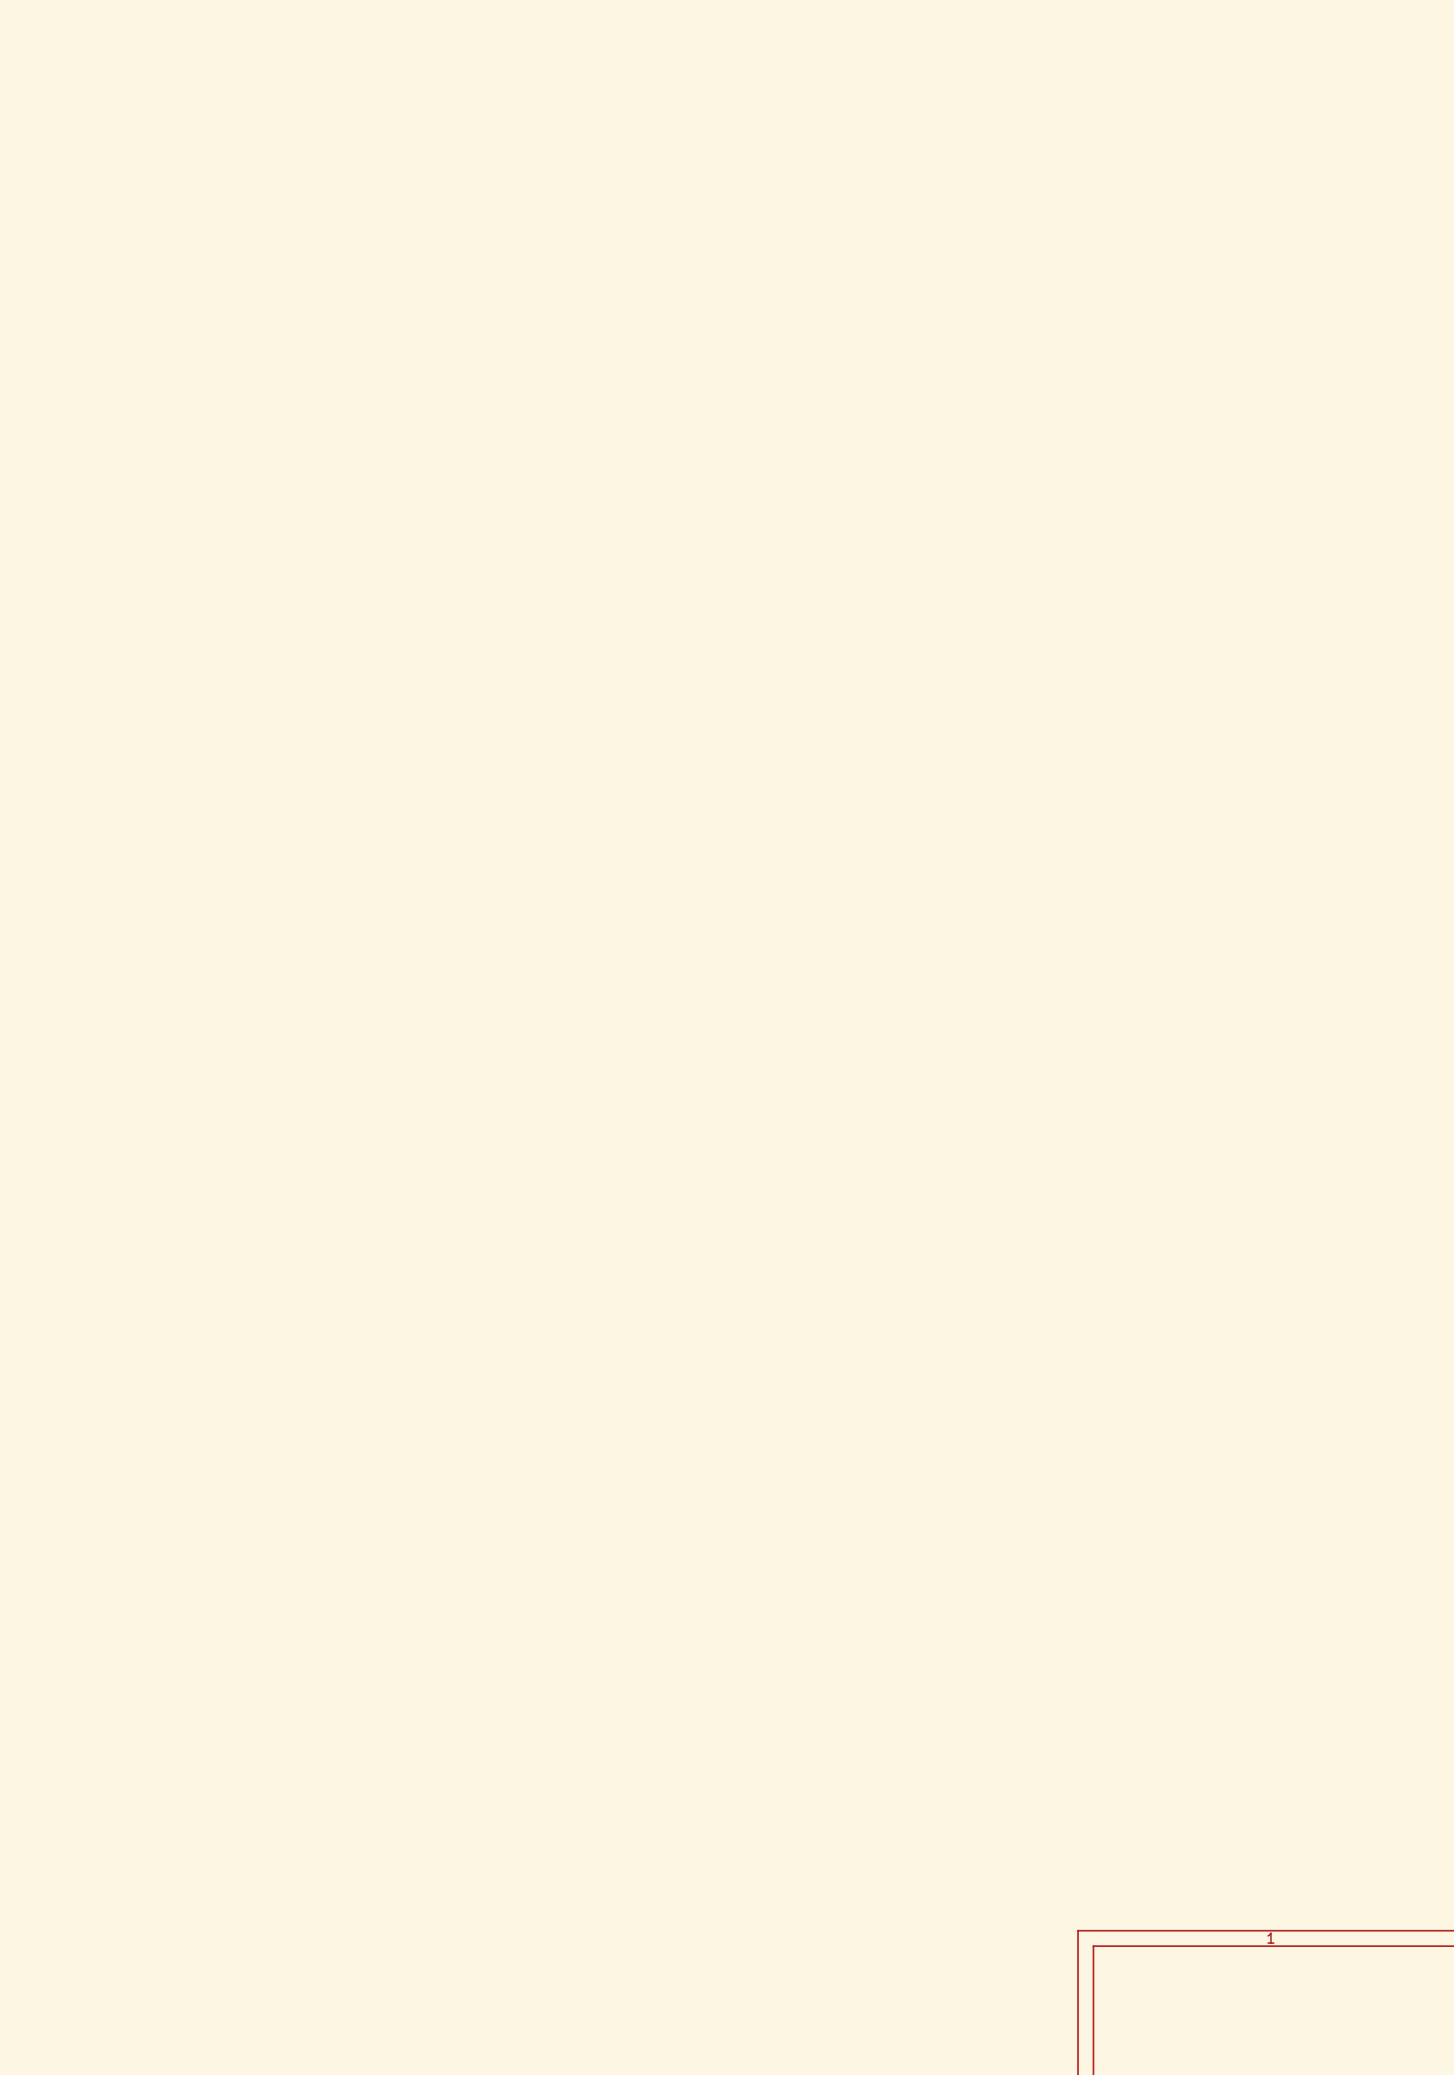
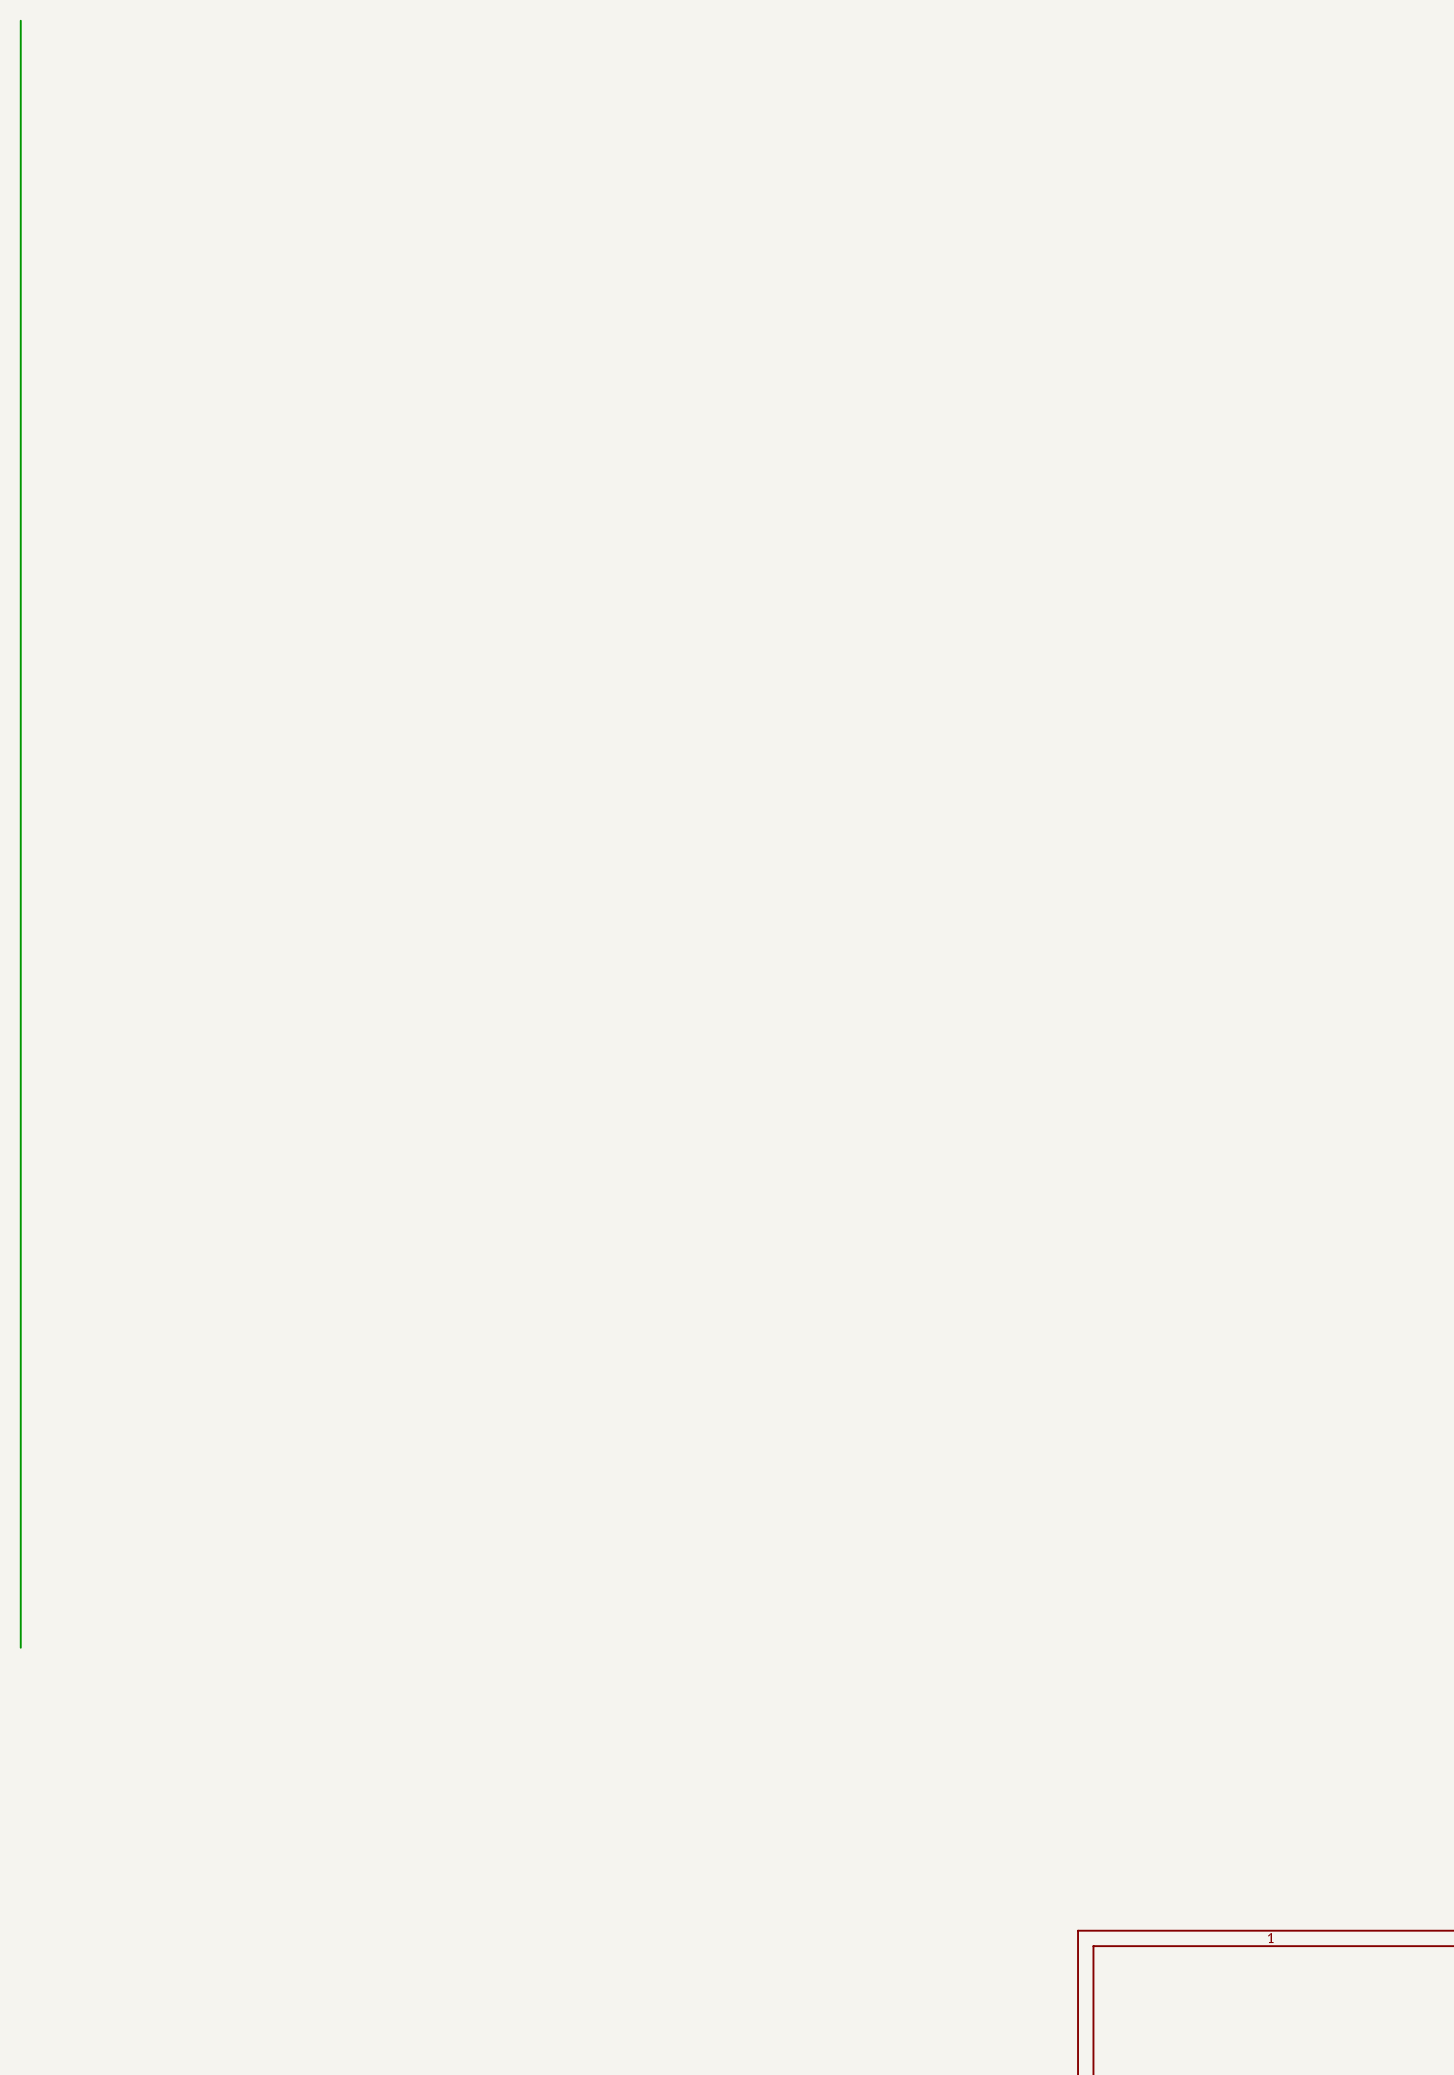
wire: none -> (20, 20) (20, 1647)

